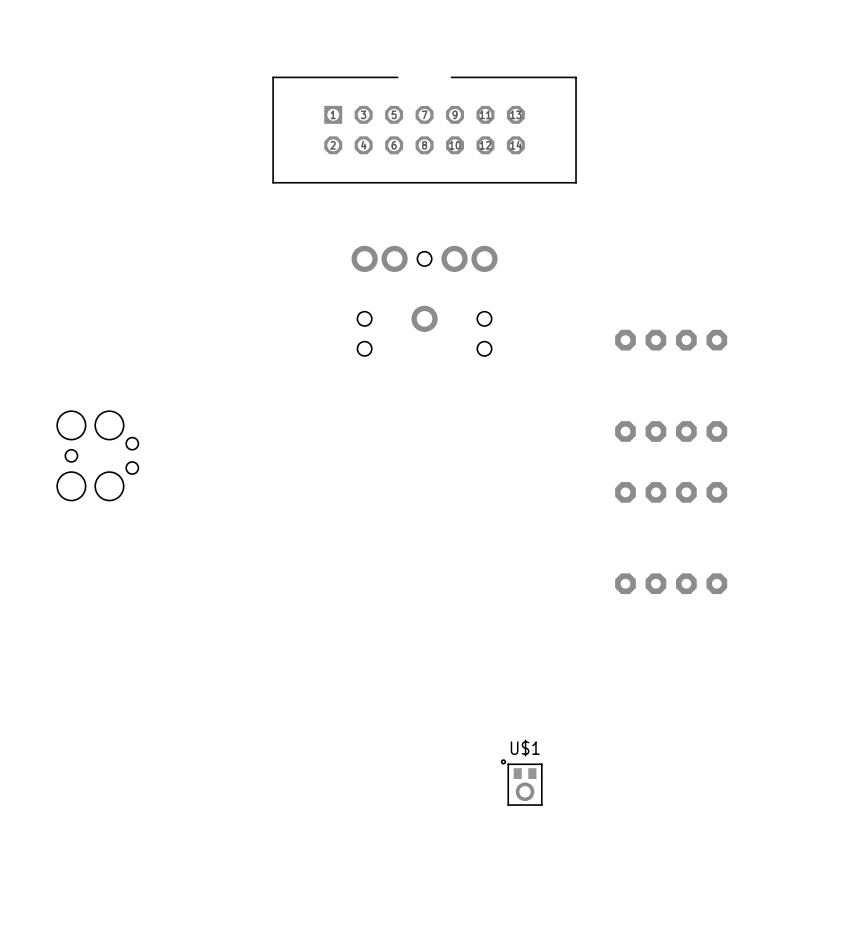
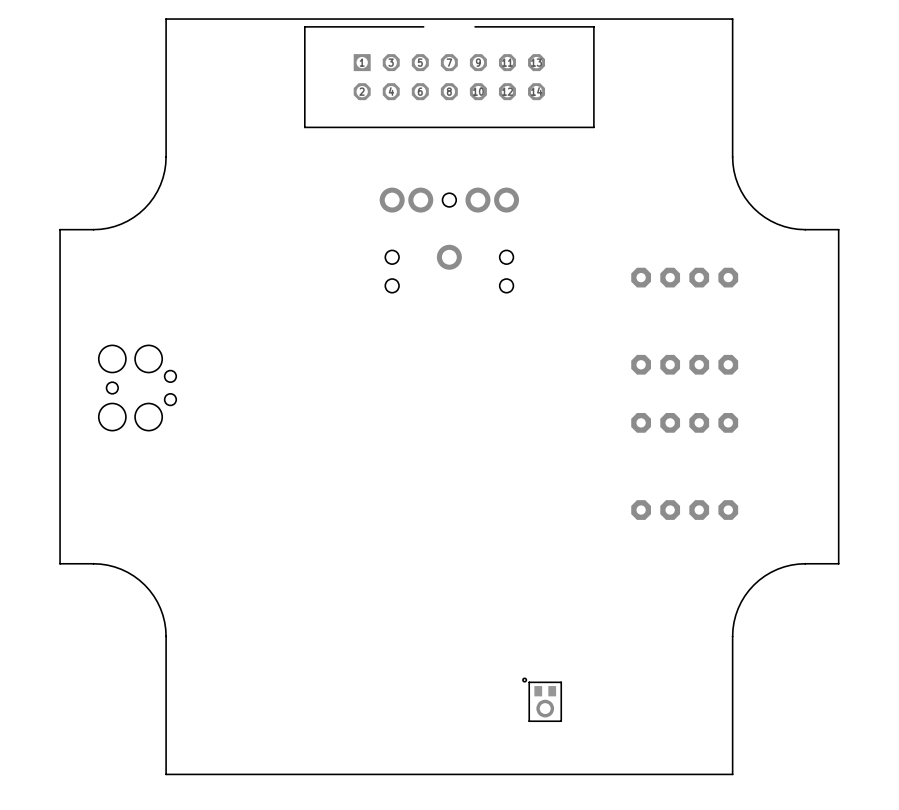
board edge: none -> (732, 19) (166, 19) (165, 164) (157, 191) (139, 213) (121, 224) (100, 229) (60, 229) (60, 563) (100, 564) (121, 569) (139, 580) (157, 602) (165, 629) (166, 774) (732, 774) (732, 629) (741, 602) (759, 580) (777, 569) (798, 564) (838, 563) (838, 229) (798, 229) (777, 224) (759, 213) (741, 191) (732, 164) (732, 19)
U$1 name: U$1 (525, 748) -> none

